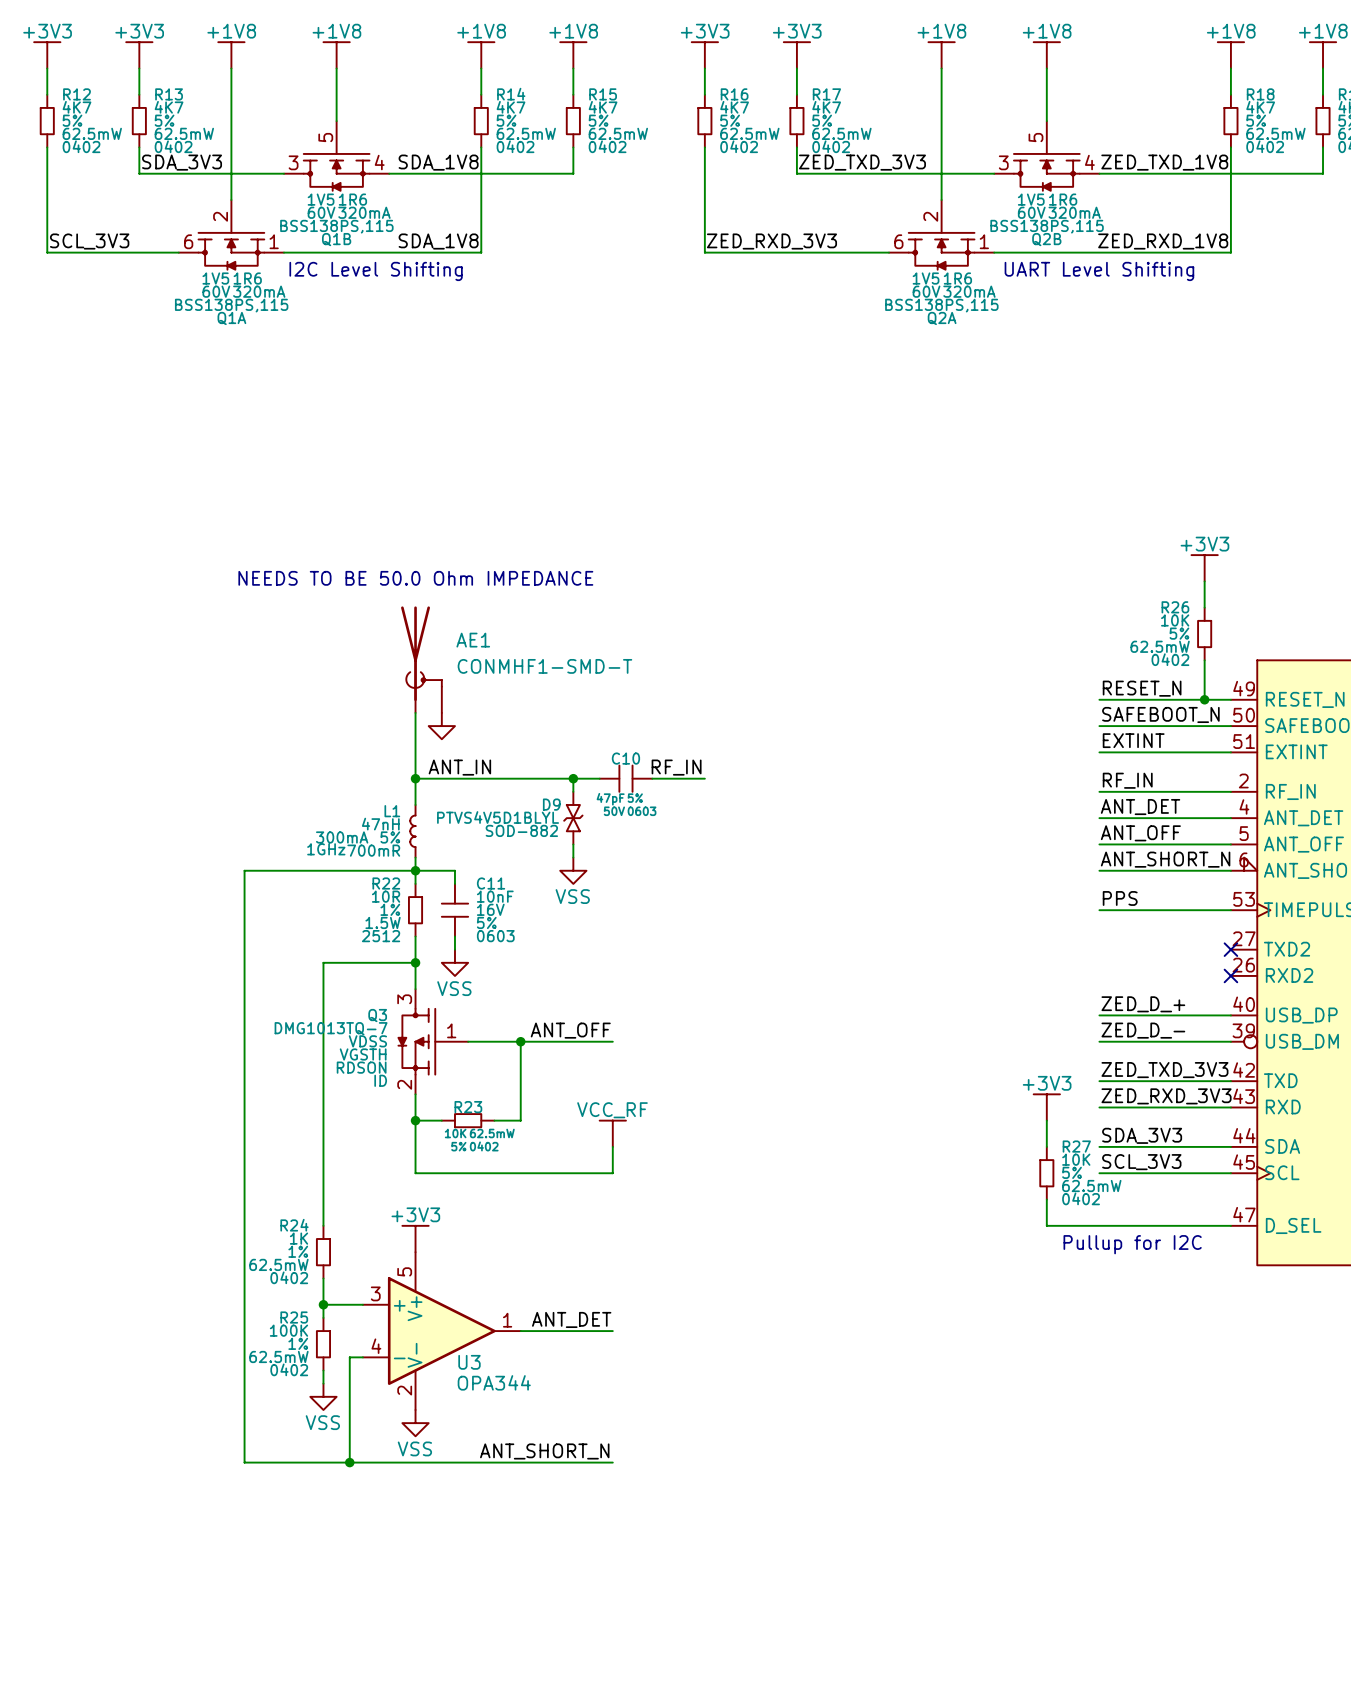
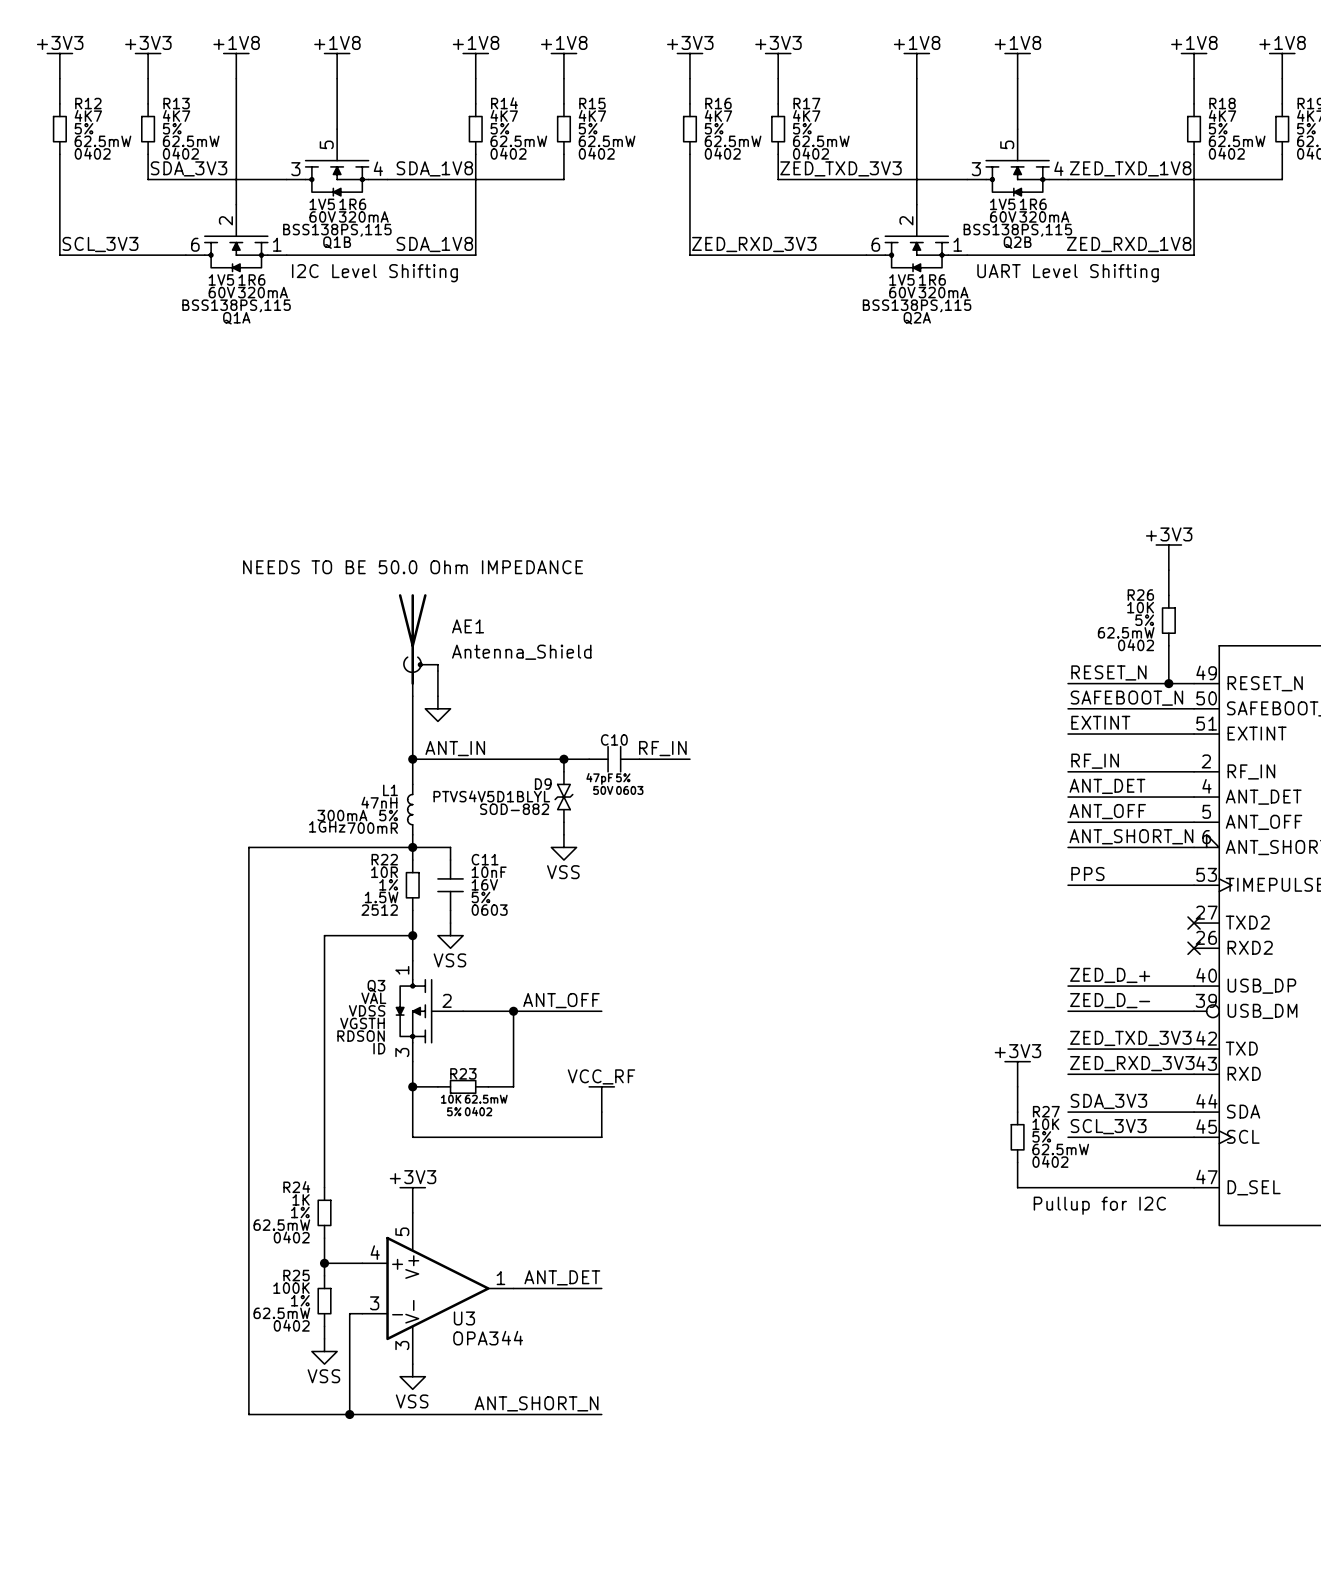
AE1 value: CONMHF1-SMD-T (544, 666) -> Antenna_Shield (521, 652)
Q3 pin number: 3 (404, 999) -> 1 (402, 970)
Q3 value: DMG1013TQ-7 (331, 1028) -> VAL (373, 998)
Q3 pin number: 1 (451, 1030) -> 2 (447, 1000)
Q3 pin number: 2 (404, 1084) -> 3 (402, 1052)
U3 pin number: 3 (375, 1293) -> 4 (375, 1252)
U3 pin number: 4 (376, 1346) -> 3 (374, 1303)
U3 pin number: 2 (404, 1390) -> 3 (402, 1345)

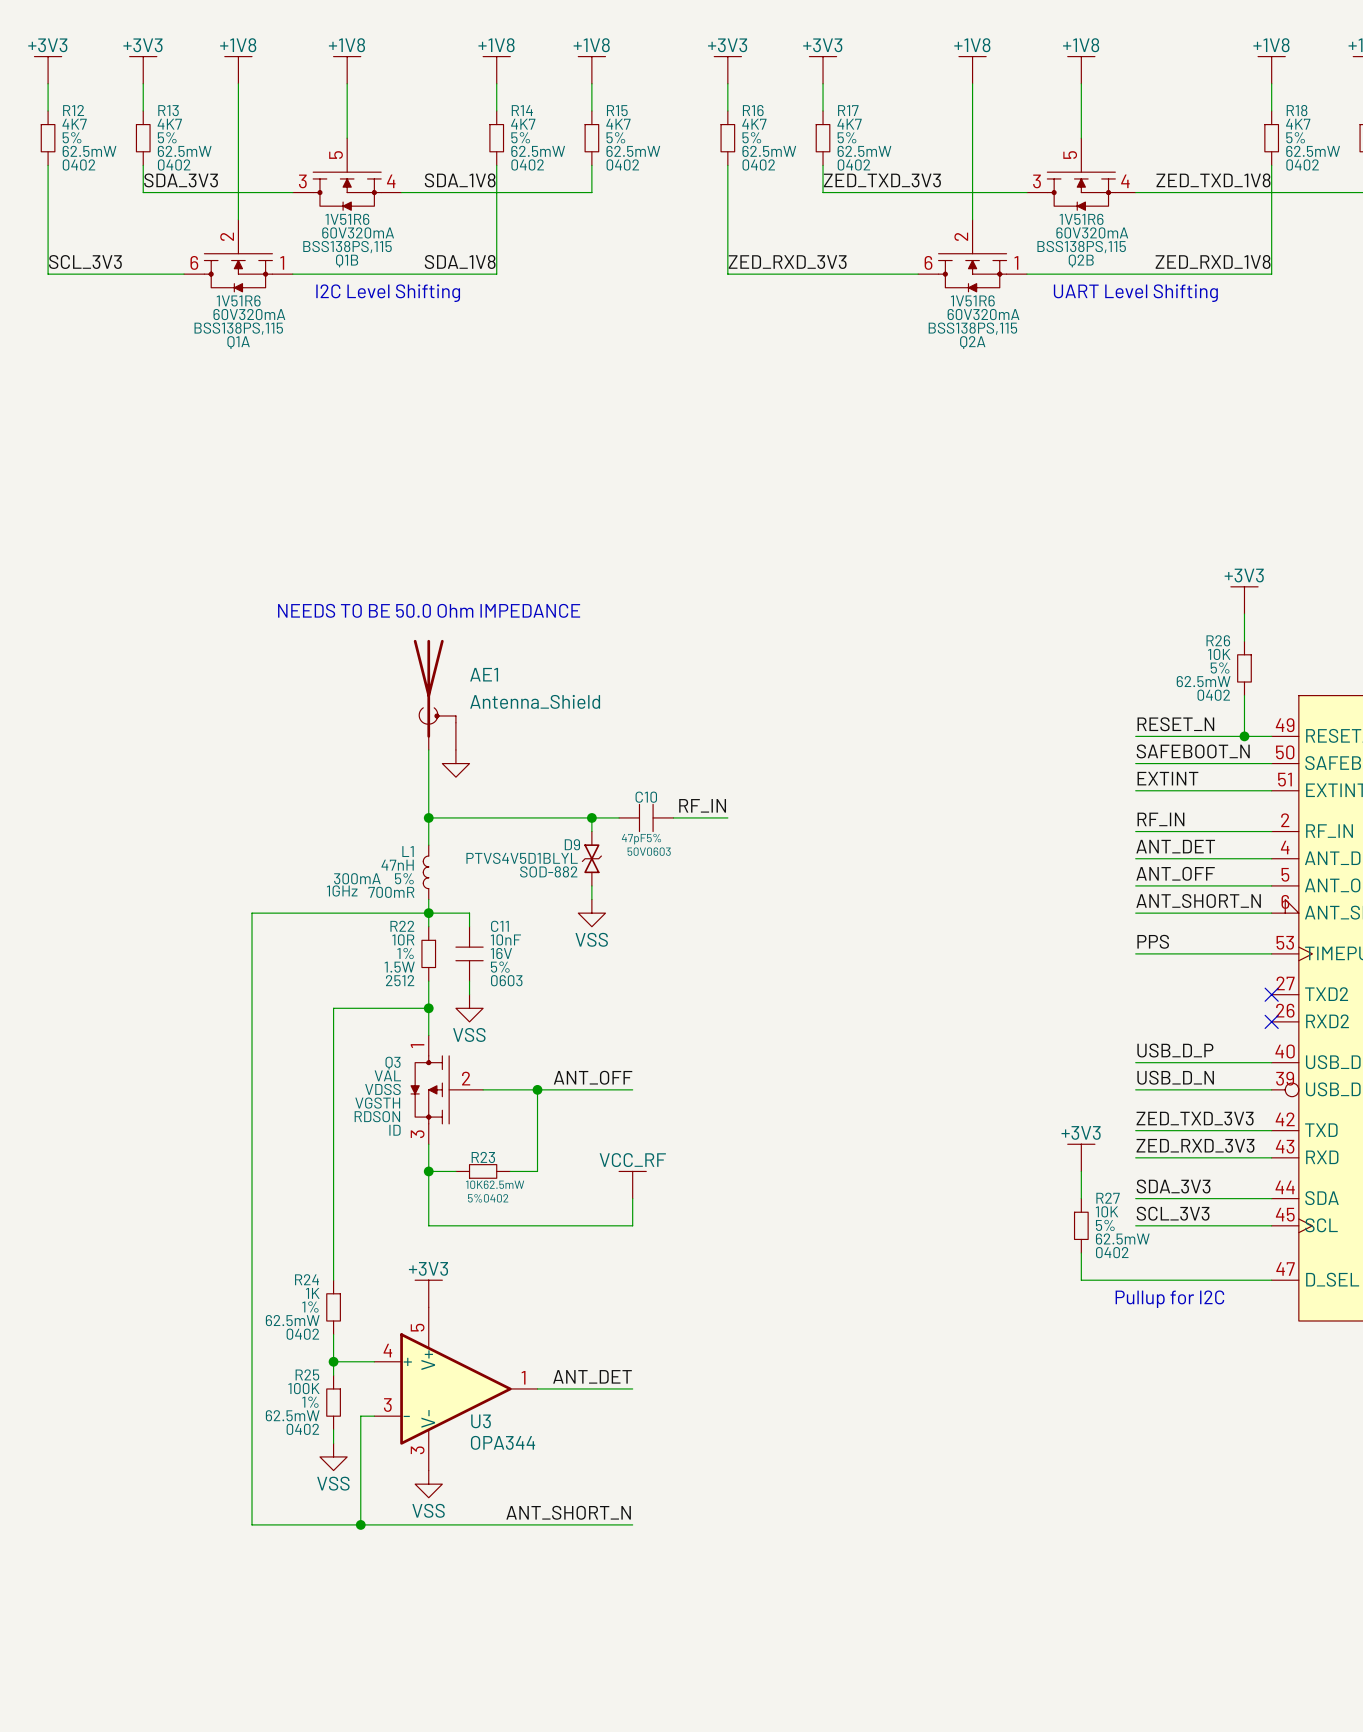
label: ANT_IN (455, 748) -> none
label: ZED_D_+ (1110, 975) -> USB_D_P (1175, 1050)
label: ZED_D_- (1110, 1000) -> USB_D_N (1175, 1077)

